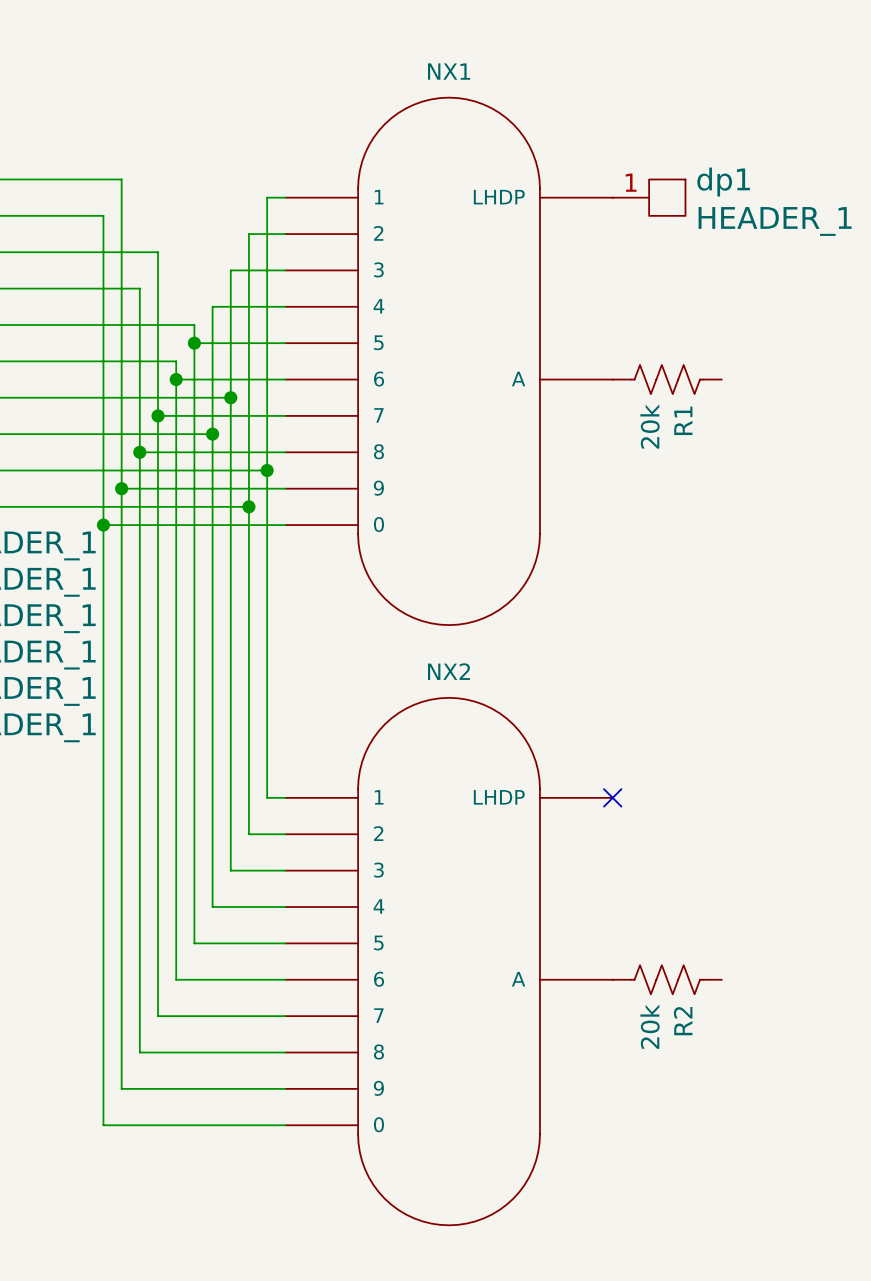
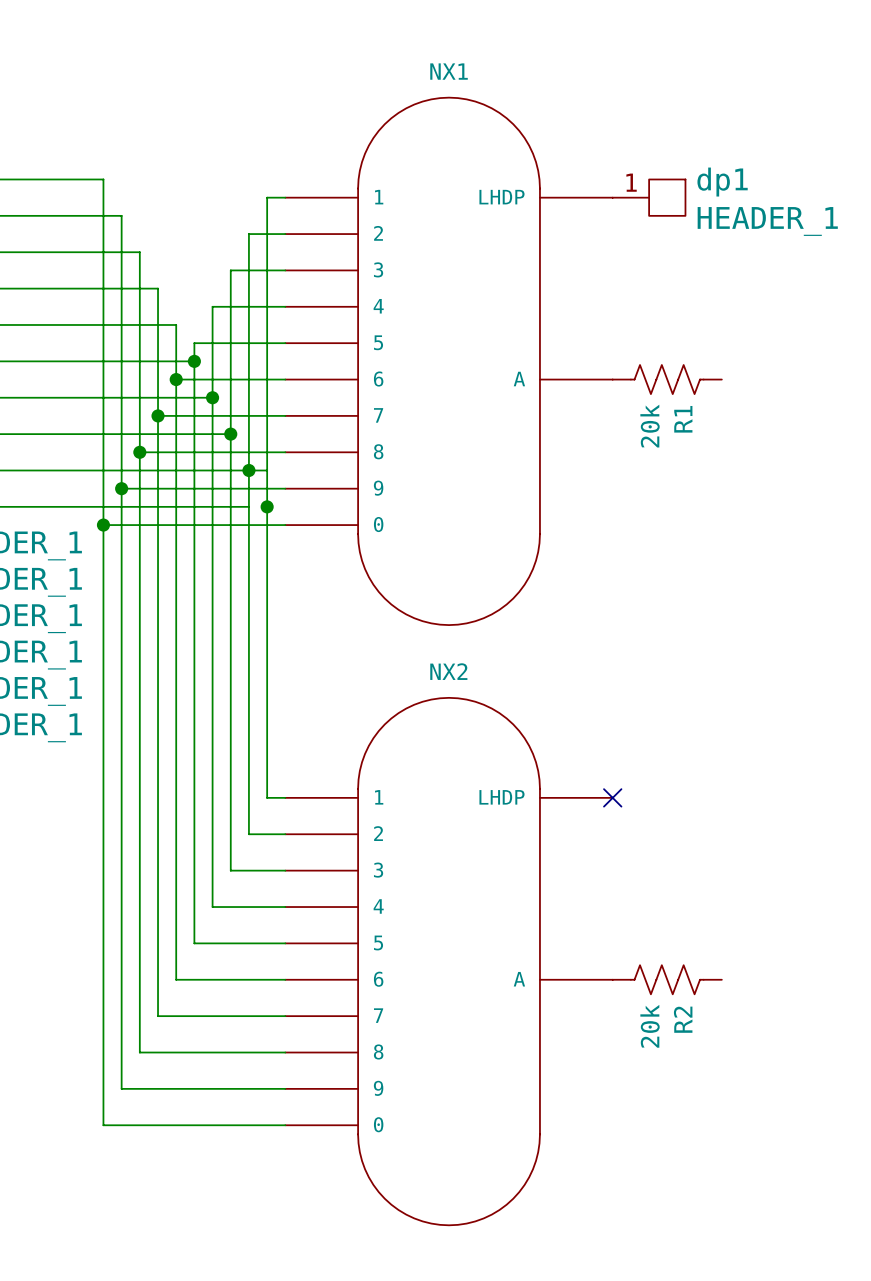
wire: (103, 179) (121, 179) (121, 215) -> (103, 179) (103, 215) (121, 215)
wire: (139, 252) (158, 252) (158, 288) -> (139, 252) (139, 288) (158, 288)
wire: (176, 324) (194, 324) (194, 343) -> (176, 324) (176, 361) (194, 361)
junction position: (194, 343) -> (194, 361)
wire: (212, 397) (230, 397) -> (212, 434) (230, 434)
junction: none -> (212, 397)
junction: (230, 397) -> none
junction: (212, 434) -> none
junction: none -> (230, 434)
junction: none -> (248, 470)
junction: (267, 470) -> none
junction: (248, 506) -> none
junction: none -> (267, 506)

